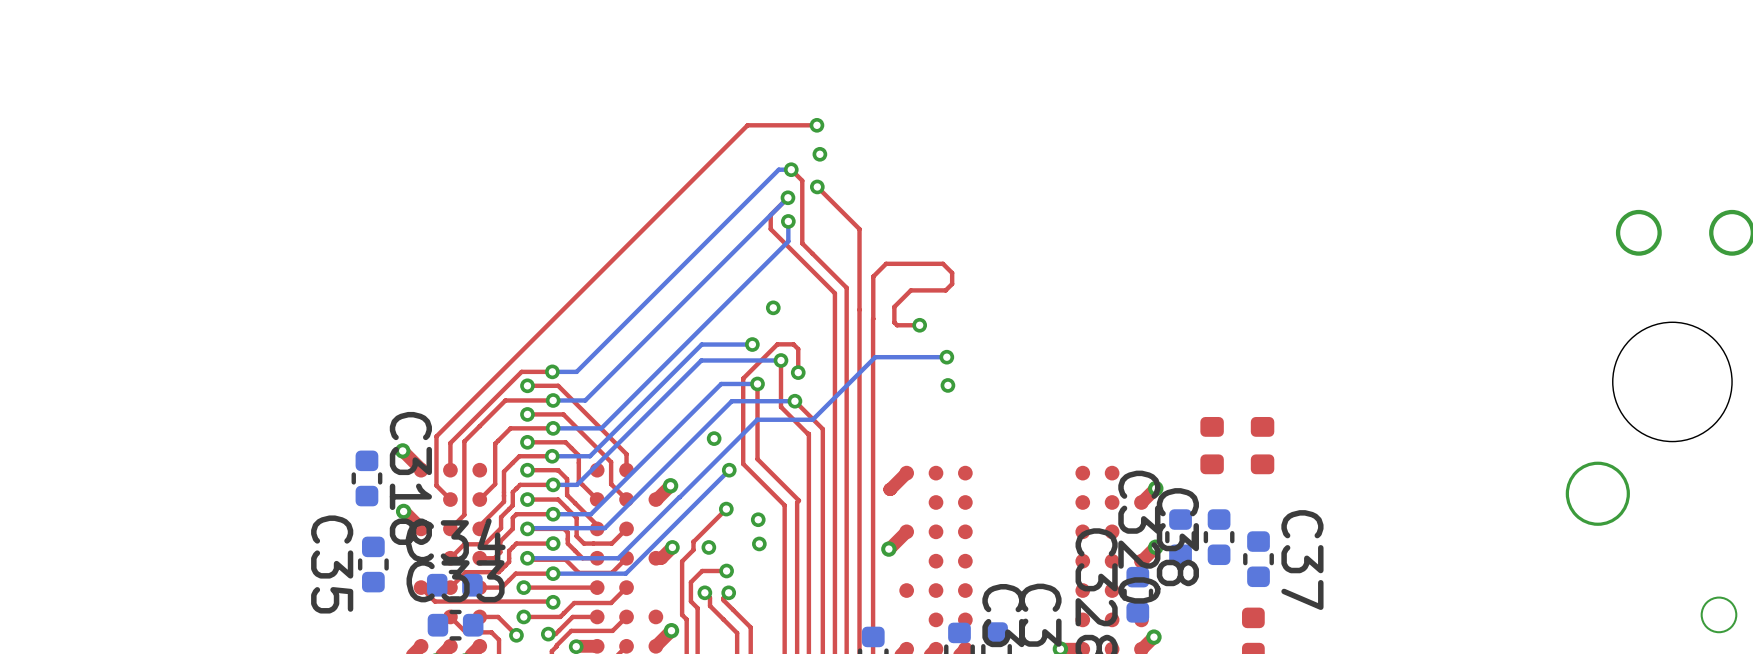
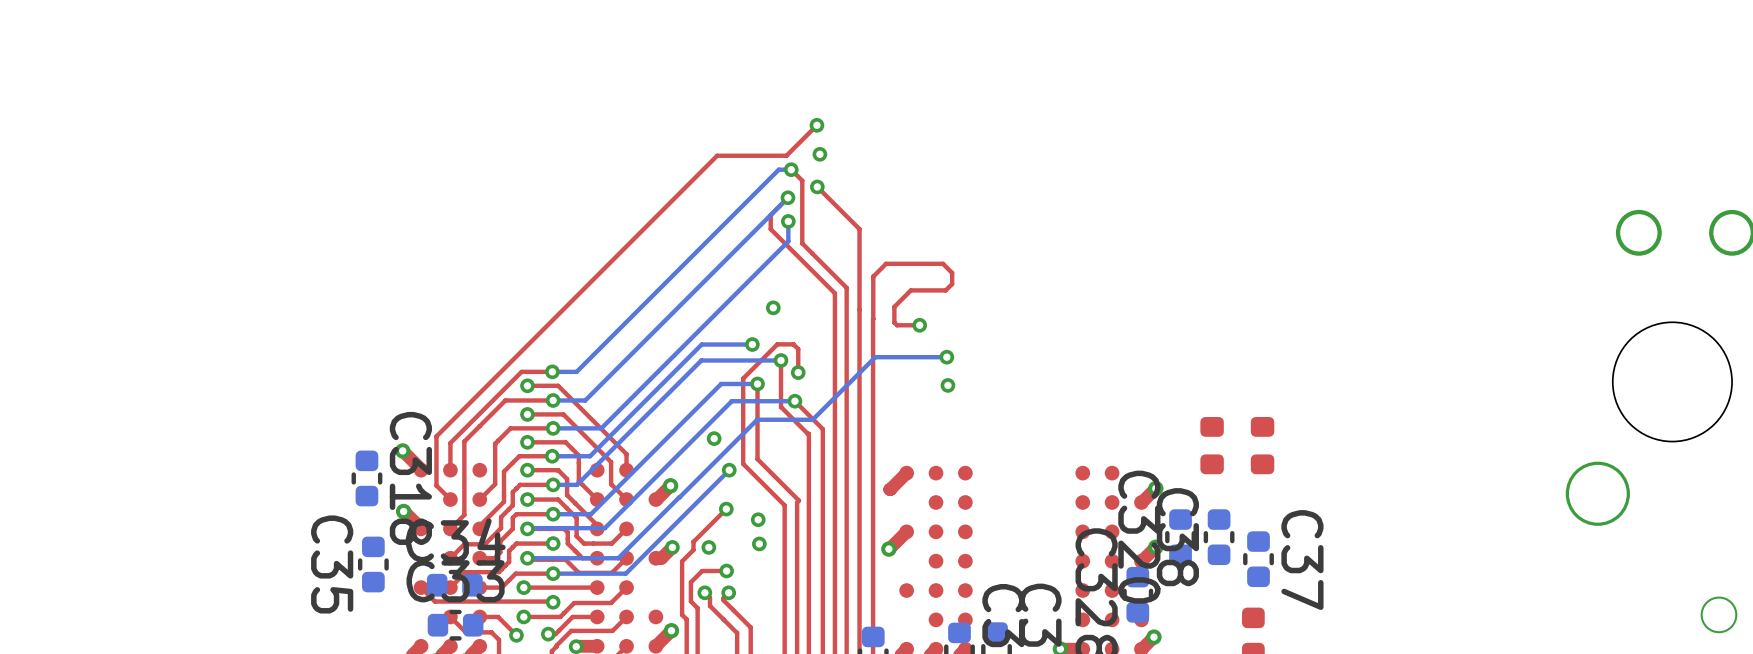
top track: (816, 125) (747, 125) (717, 155) -> (816, 125) (786, 155) (717, 155)

